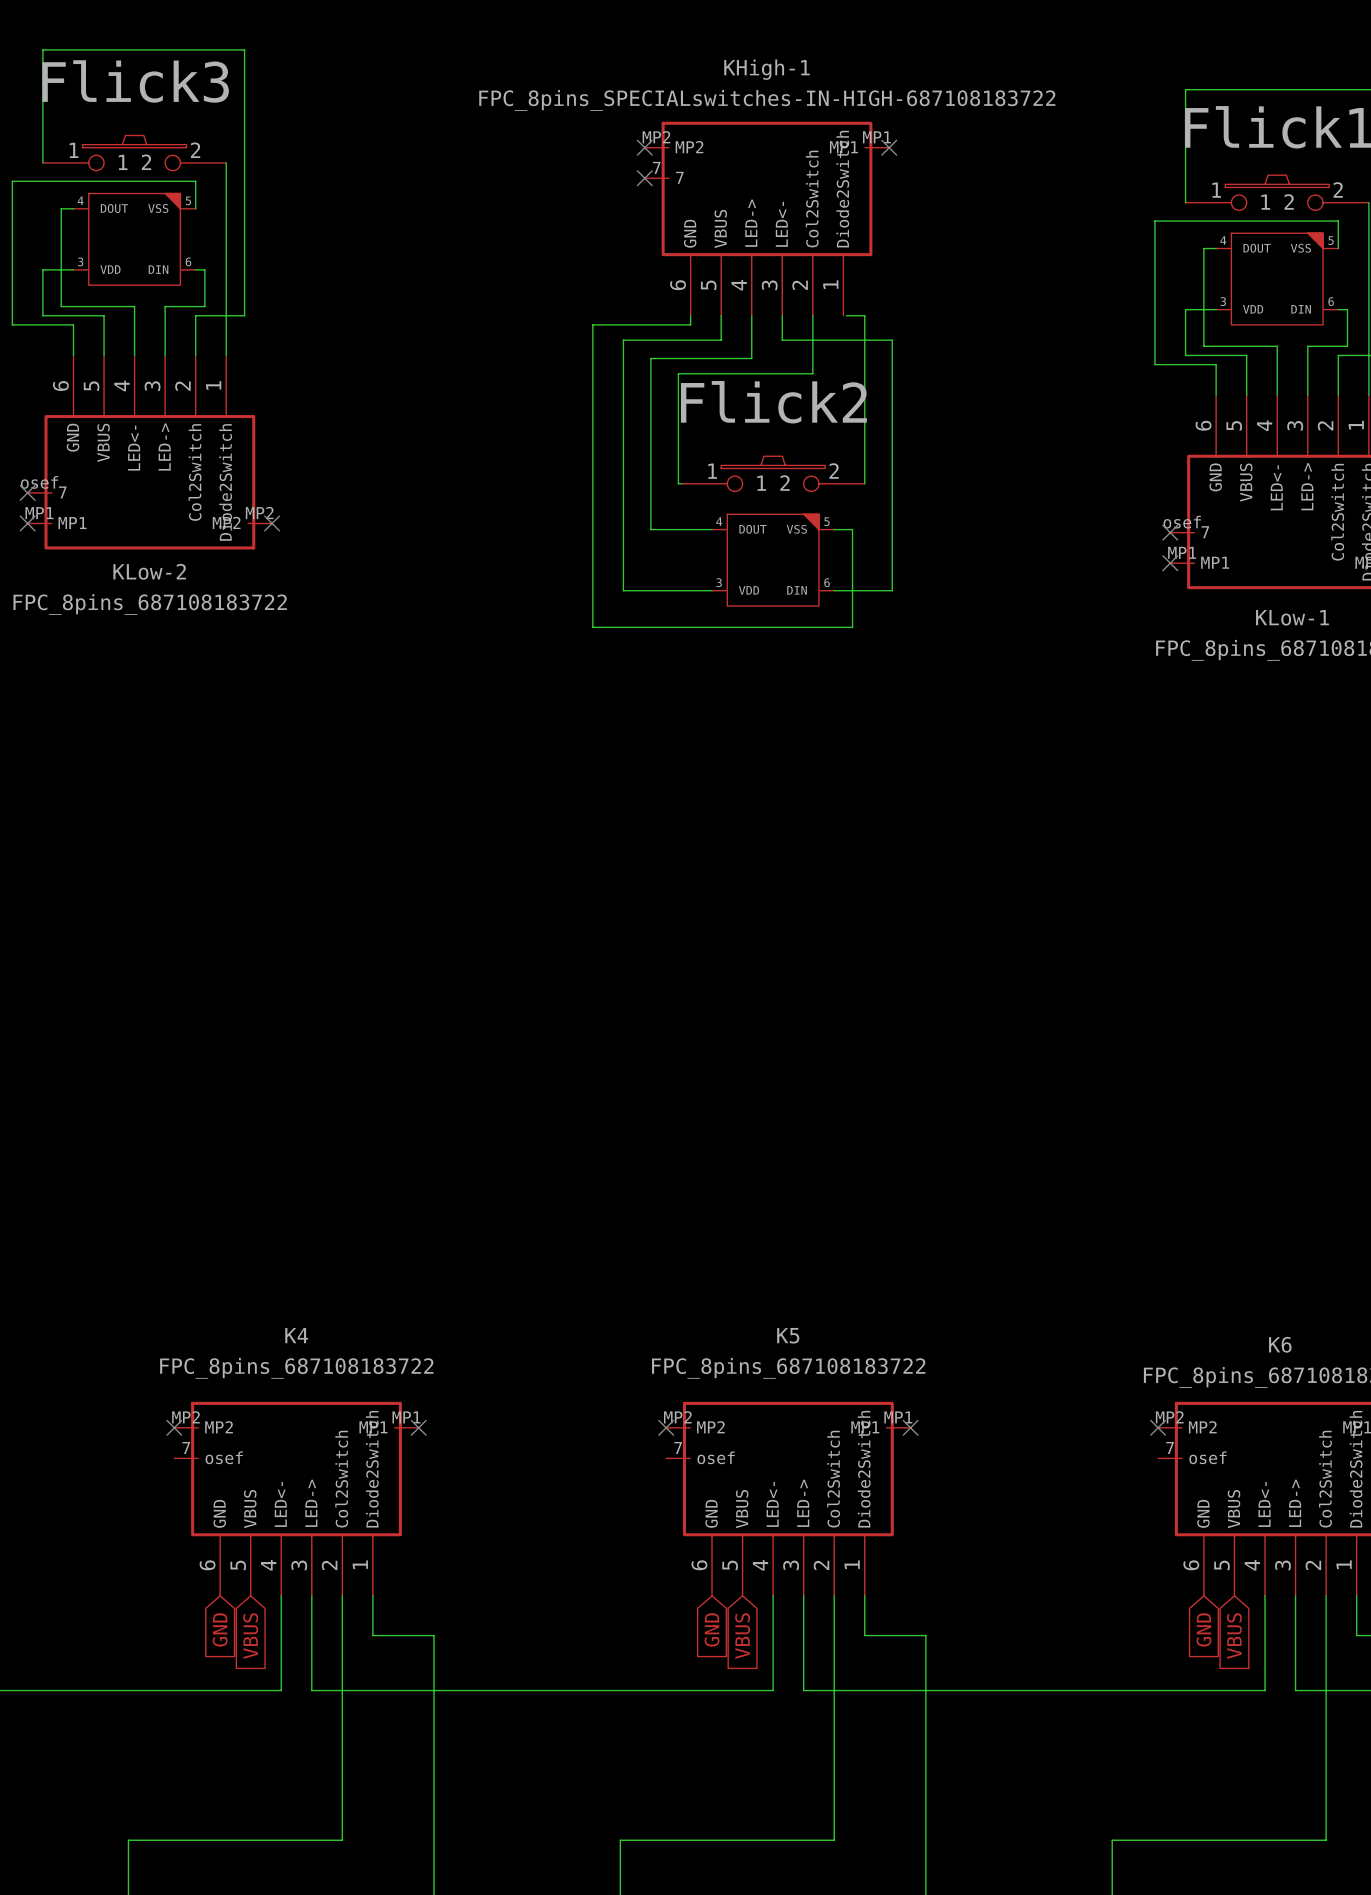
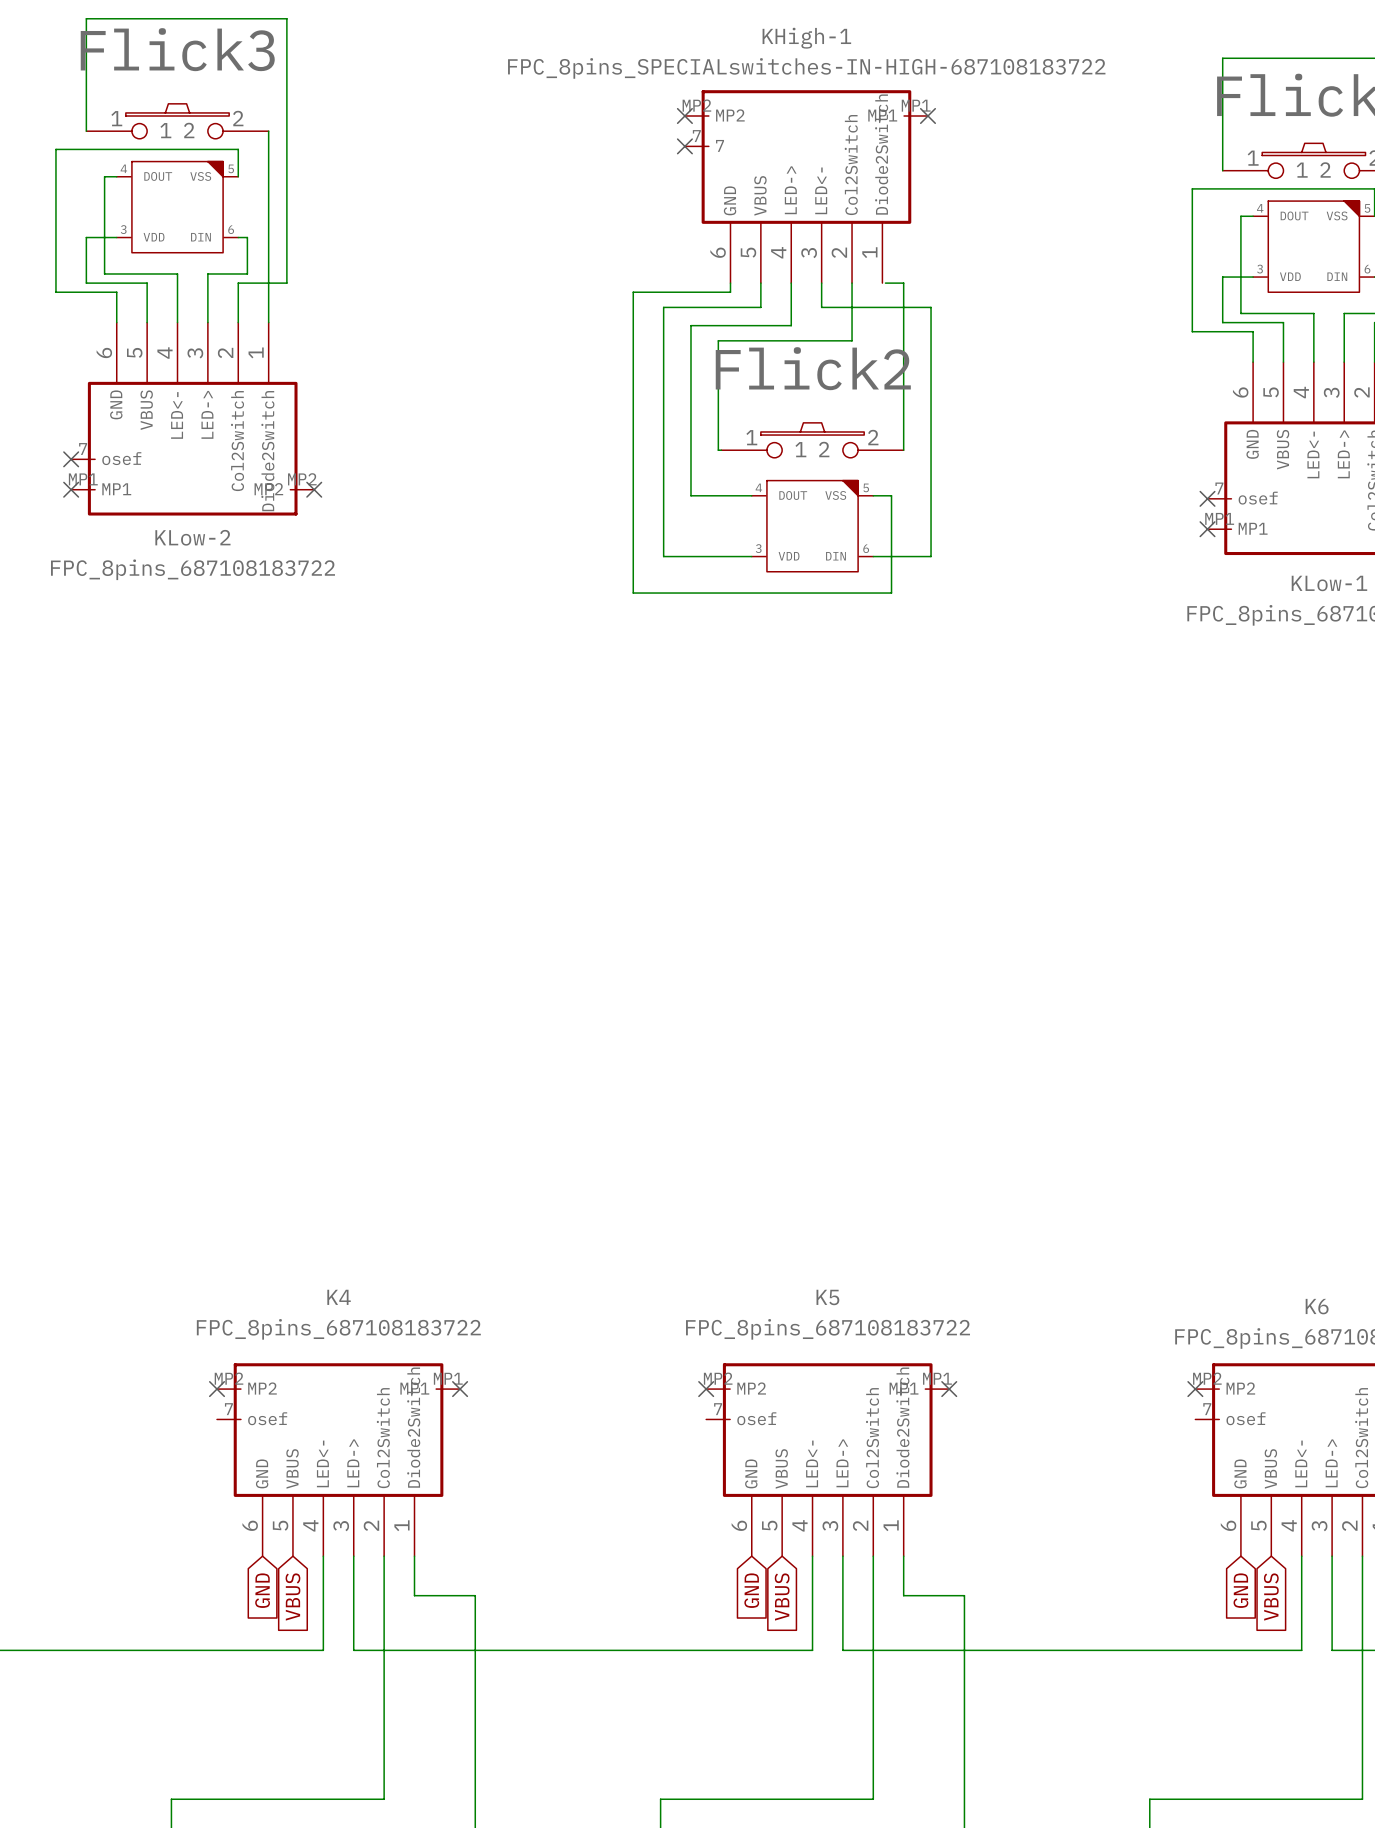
KLow-2 pin number: osef (39, 482) -> 7 (83, 449)
KLow-2 pin name: 7 (62, 492) -> osef (121, 458)
KLow-1 pin number: osef (1182, 522) -> 7 (1219, 488)
KLow-1 pin name: 7 (1205, 532) -> osef (1258, 498)

